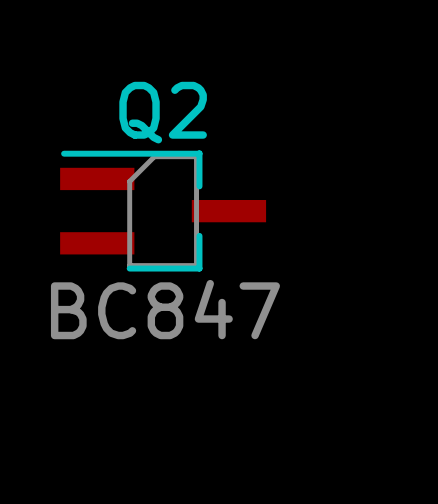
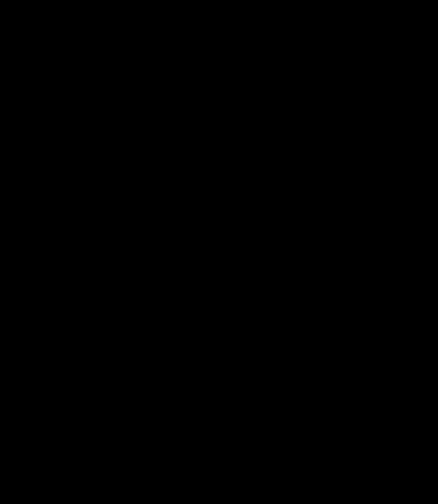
Q2: BC847 (163, 210) -> none

